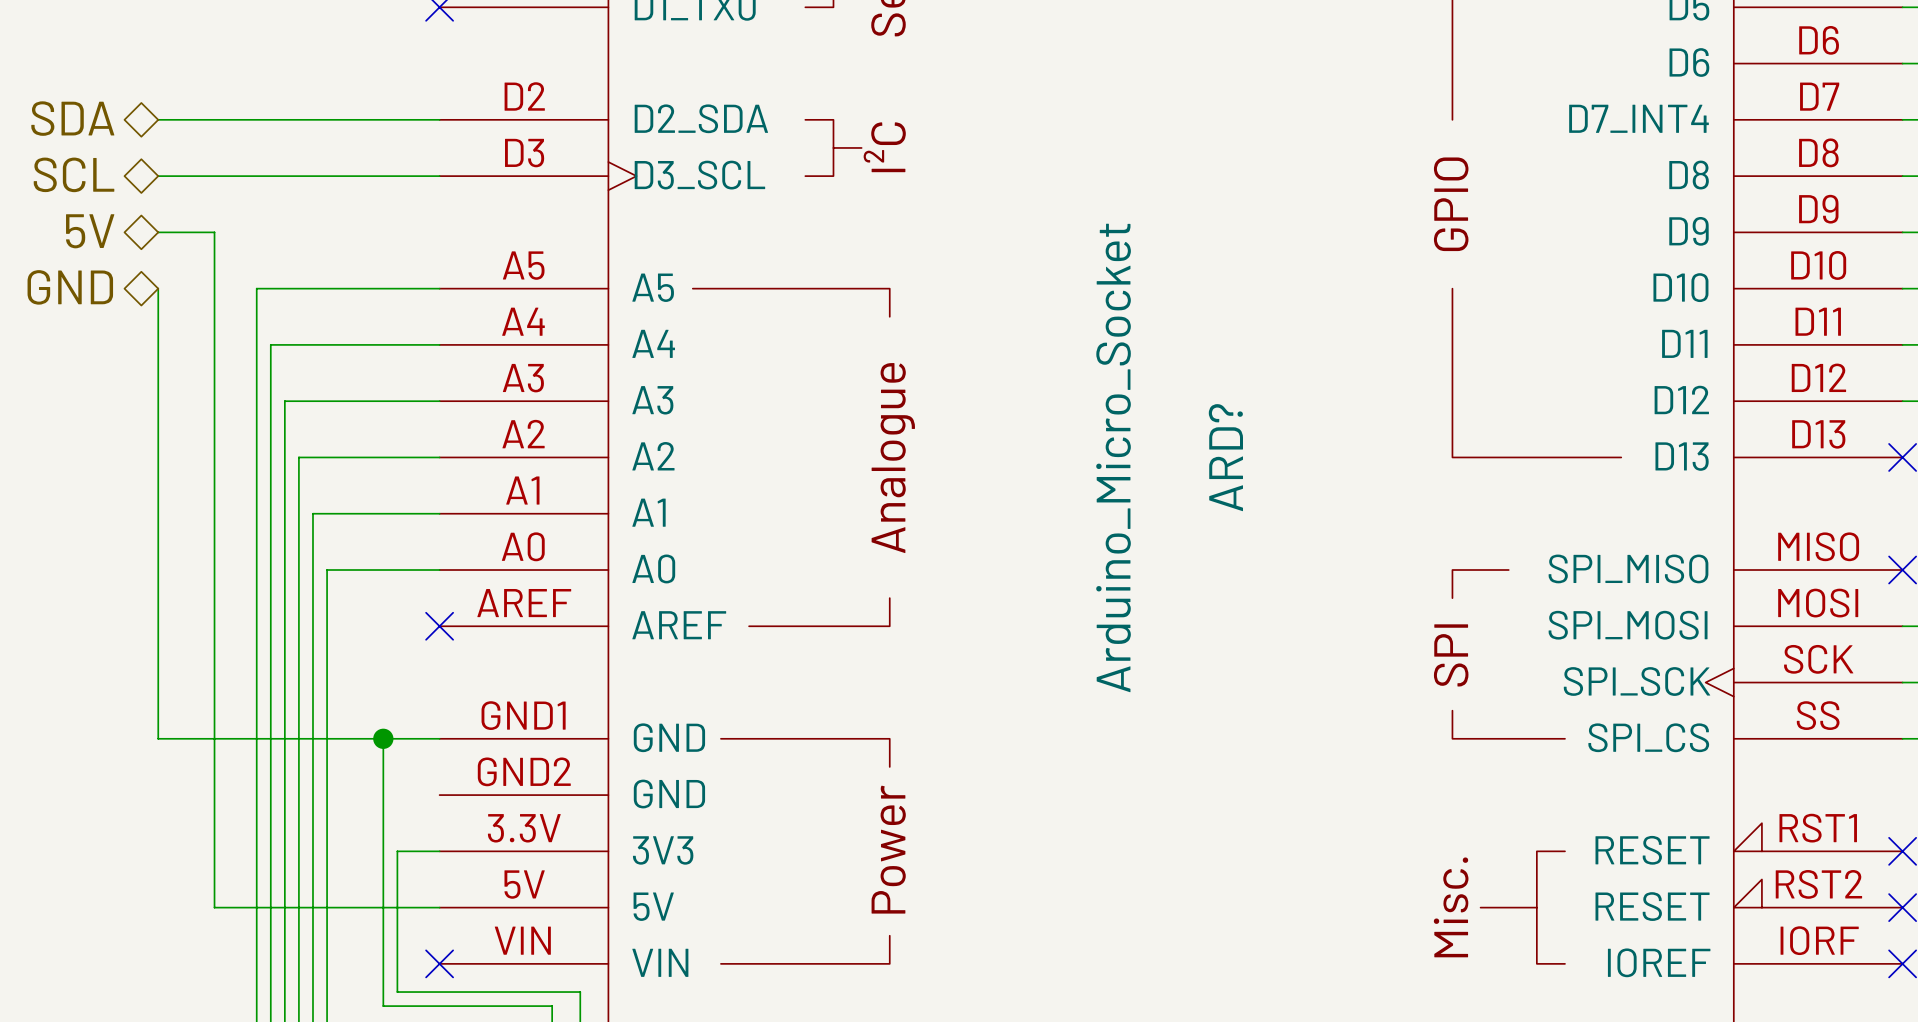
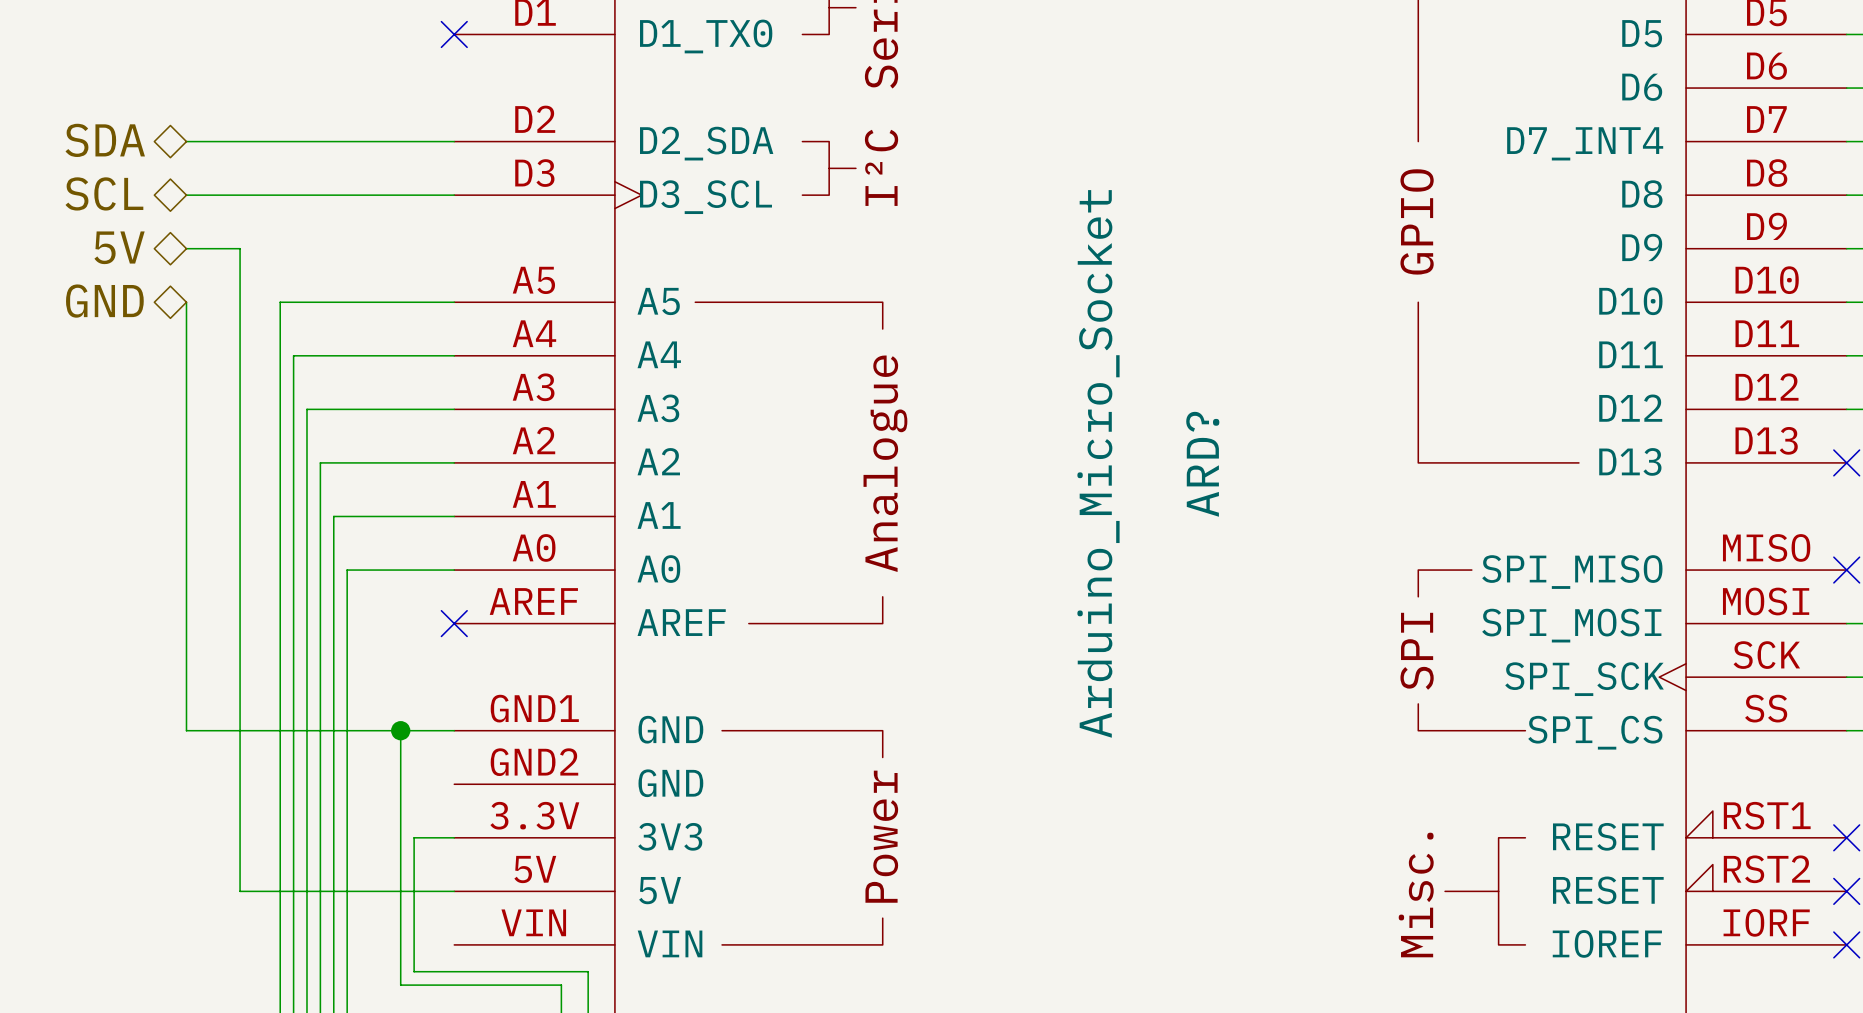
no-connect mark: (439, 963) -> none

